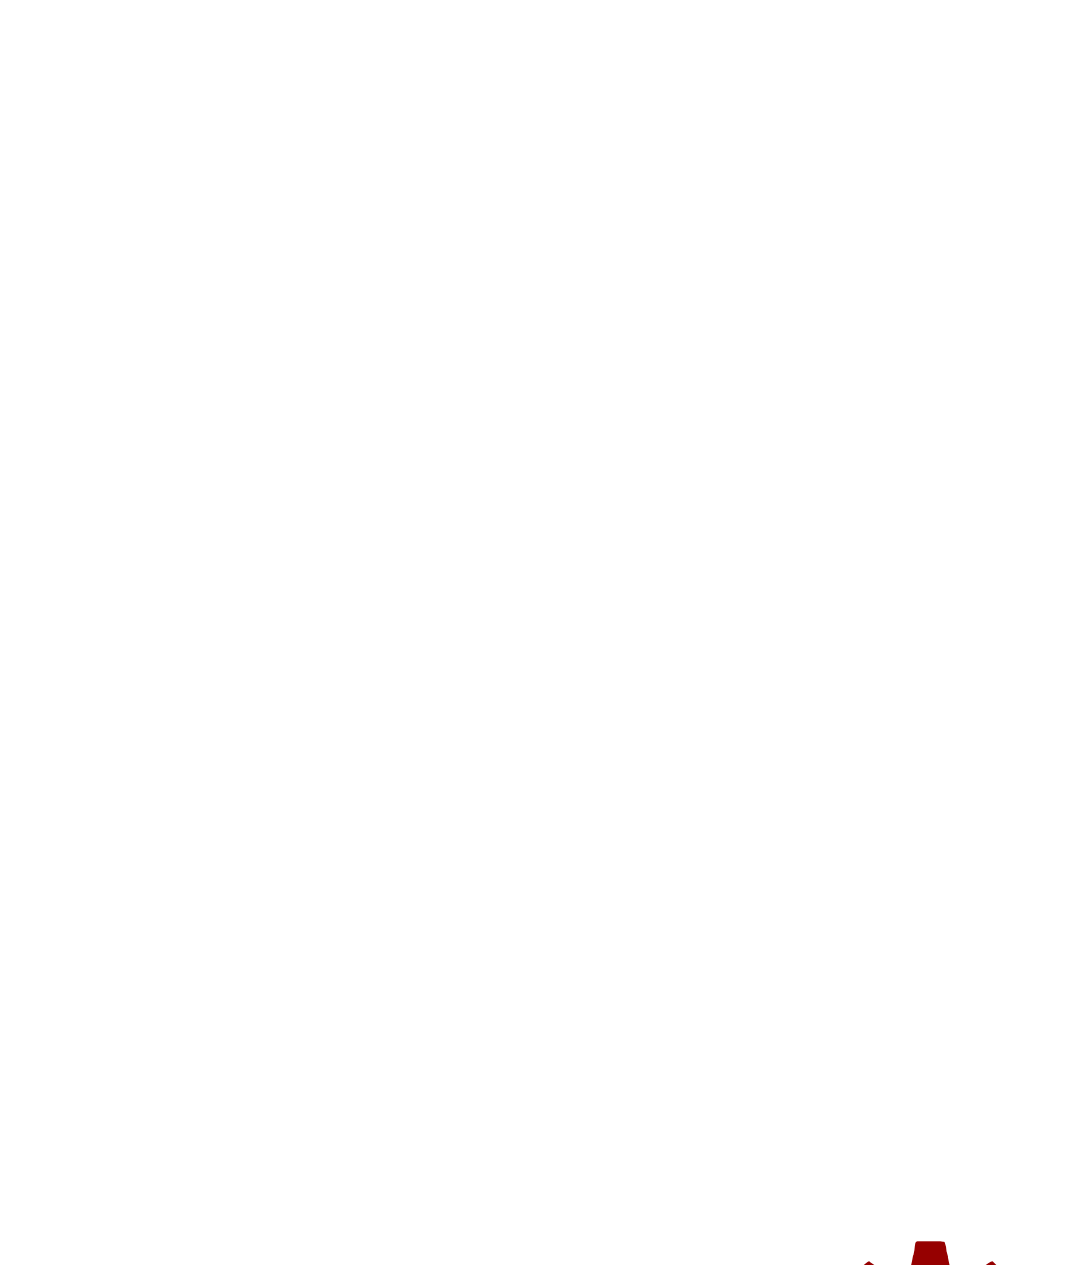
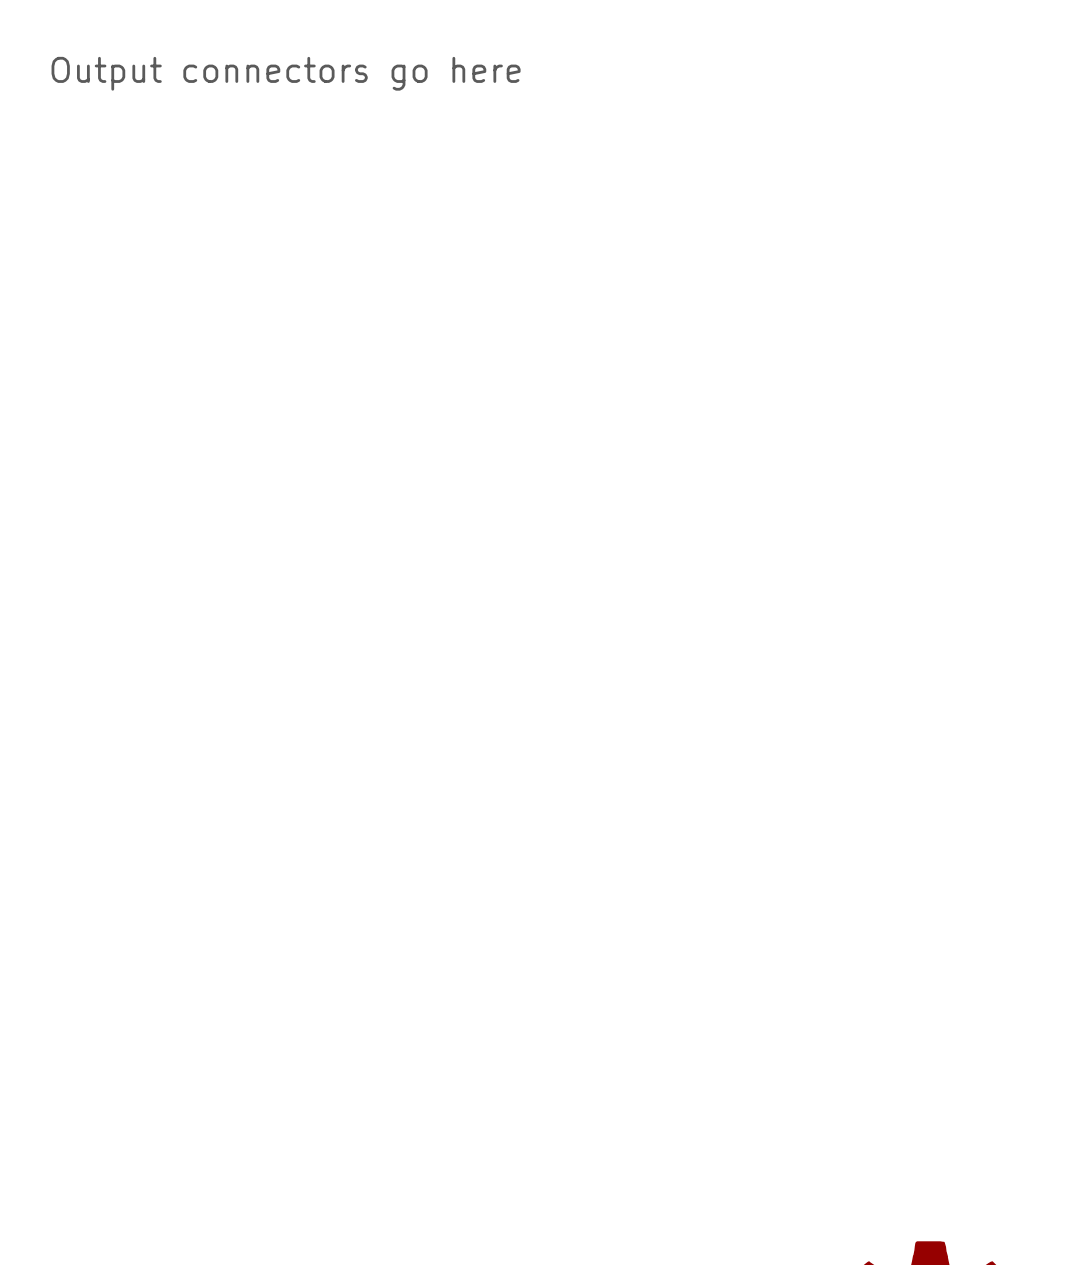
text: none -> Output connectors go here (286, 73)

